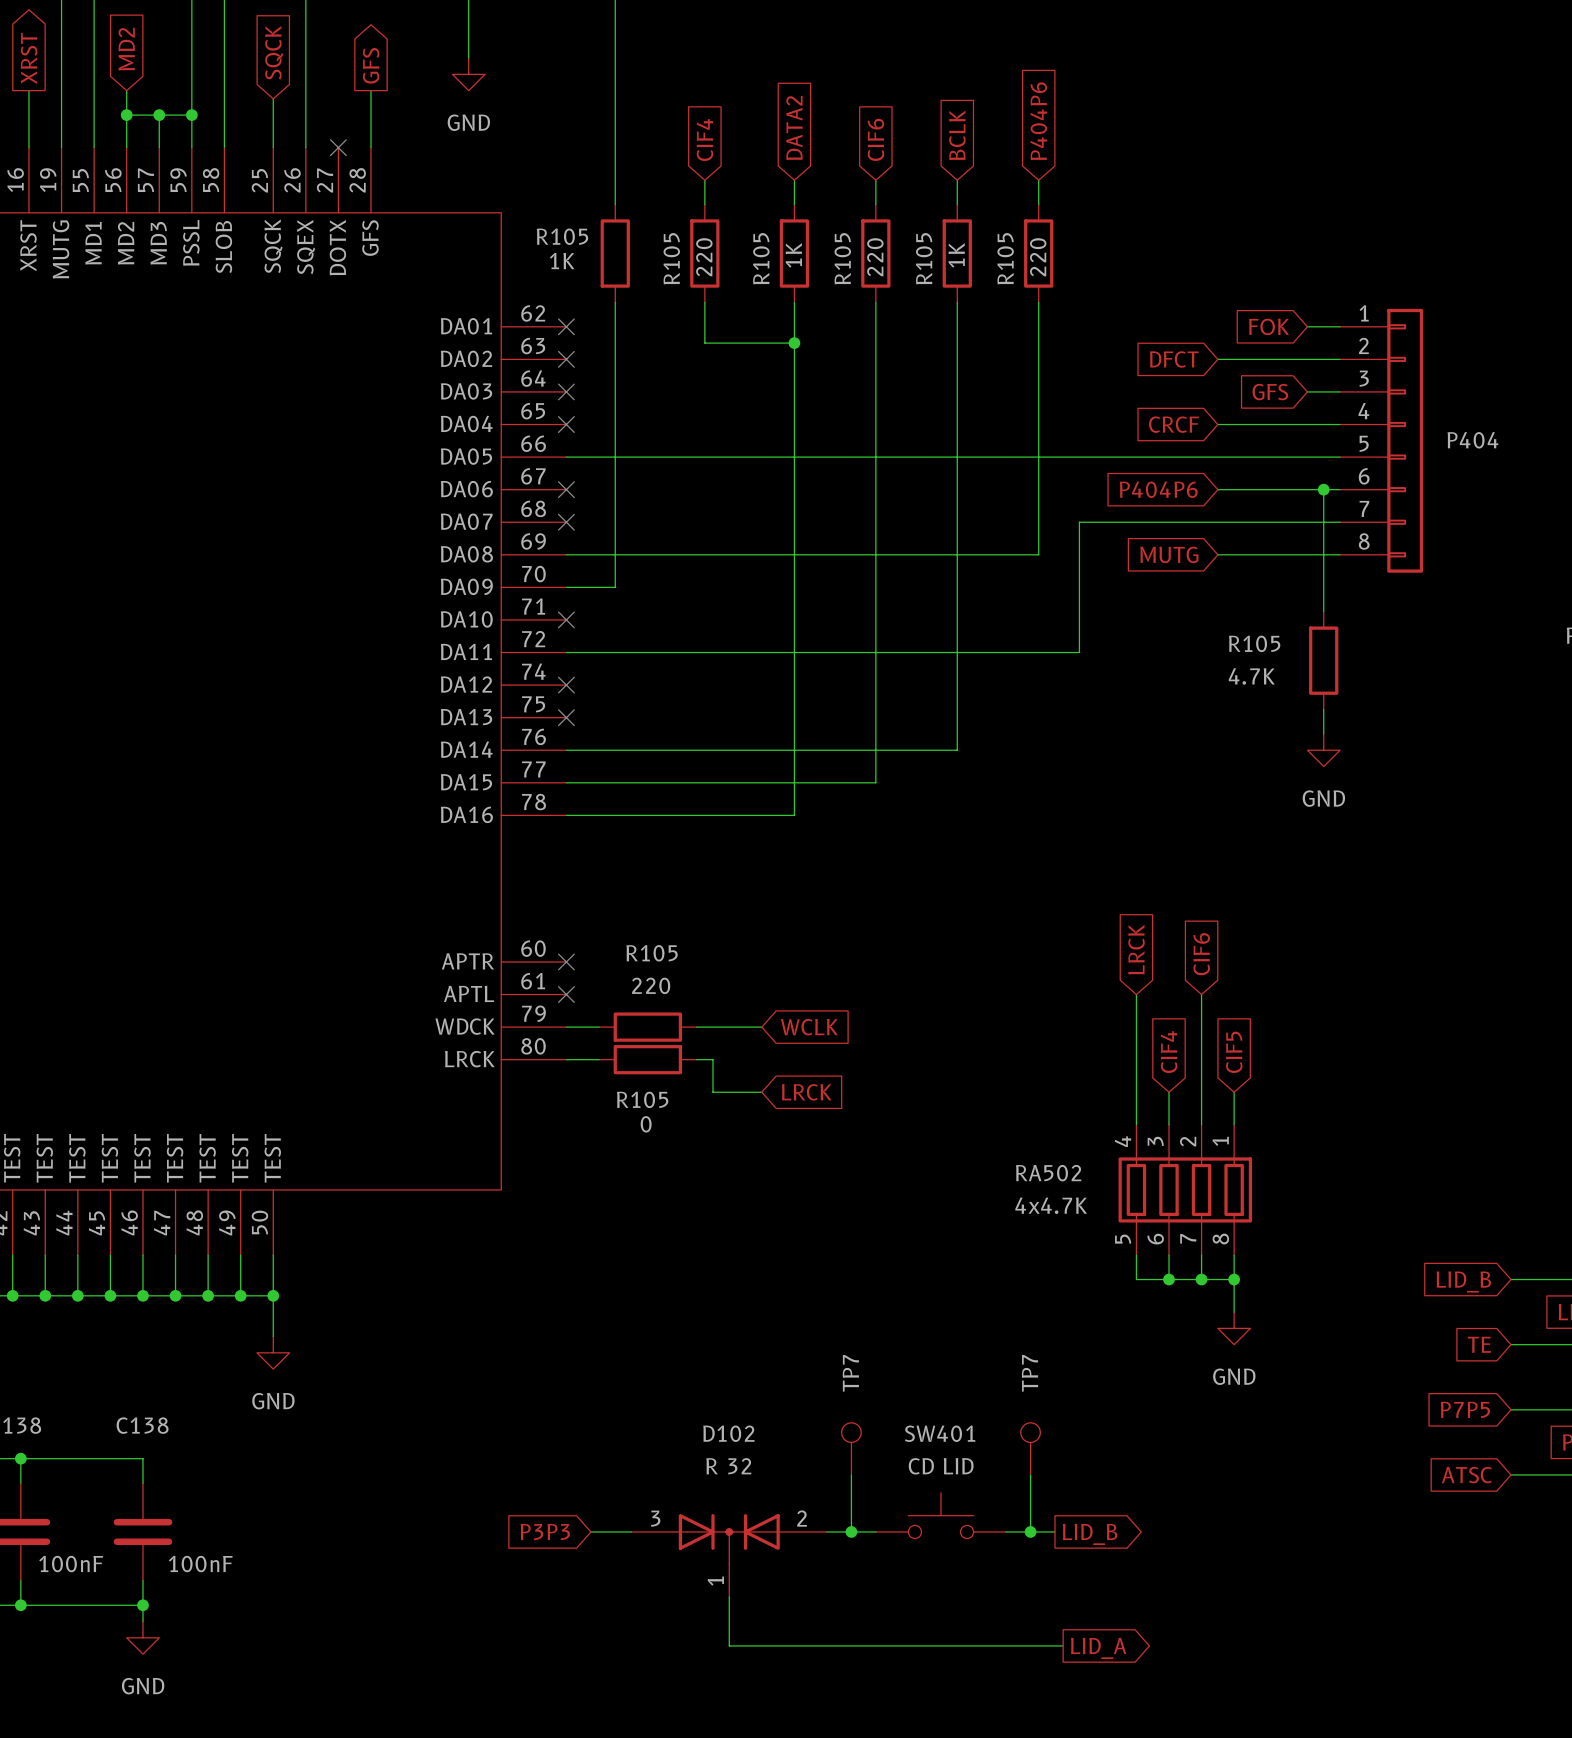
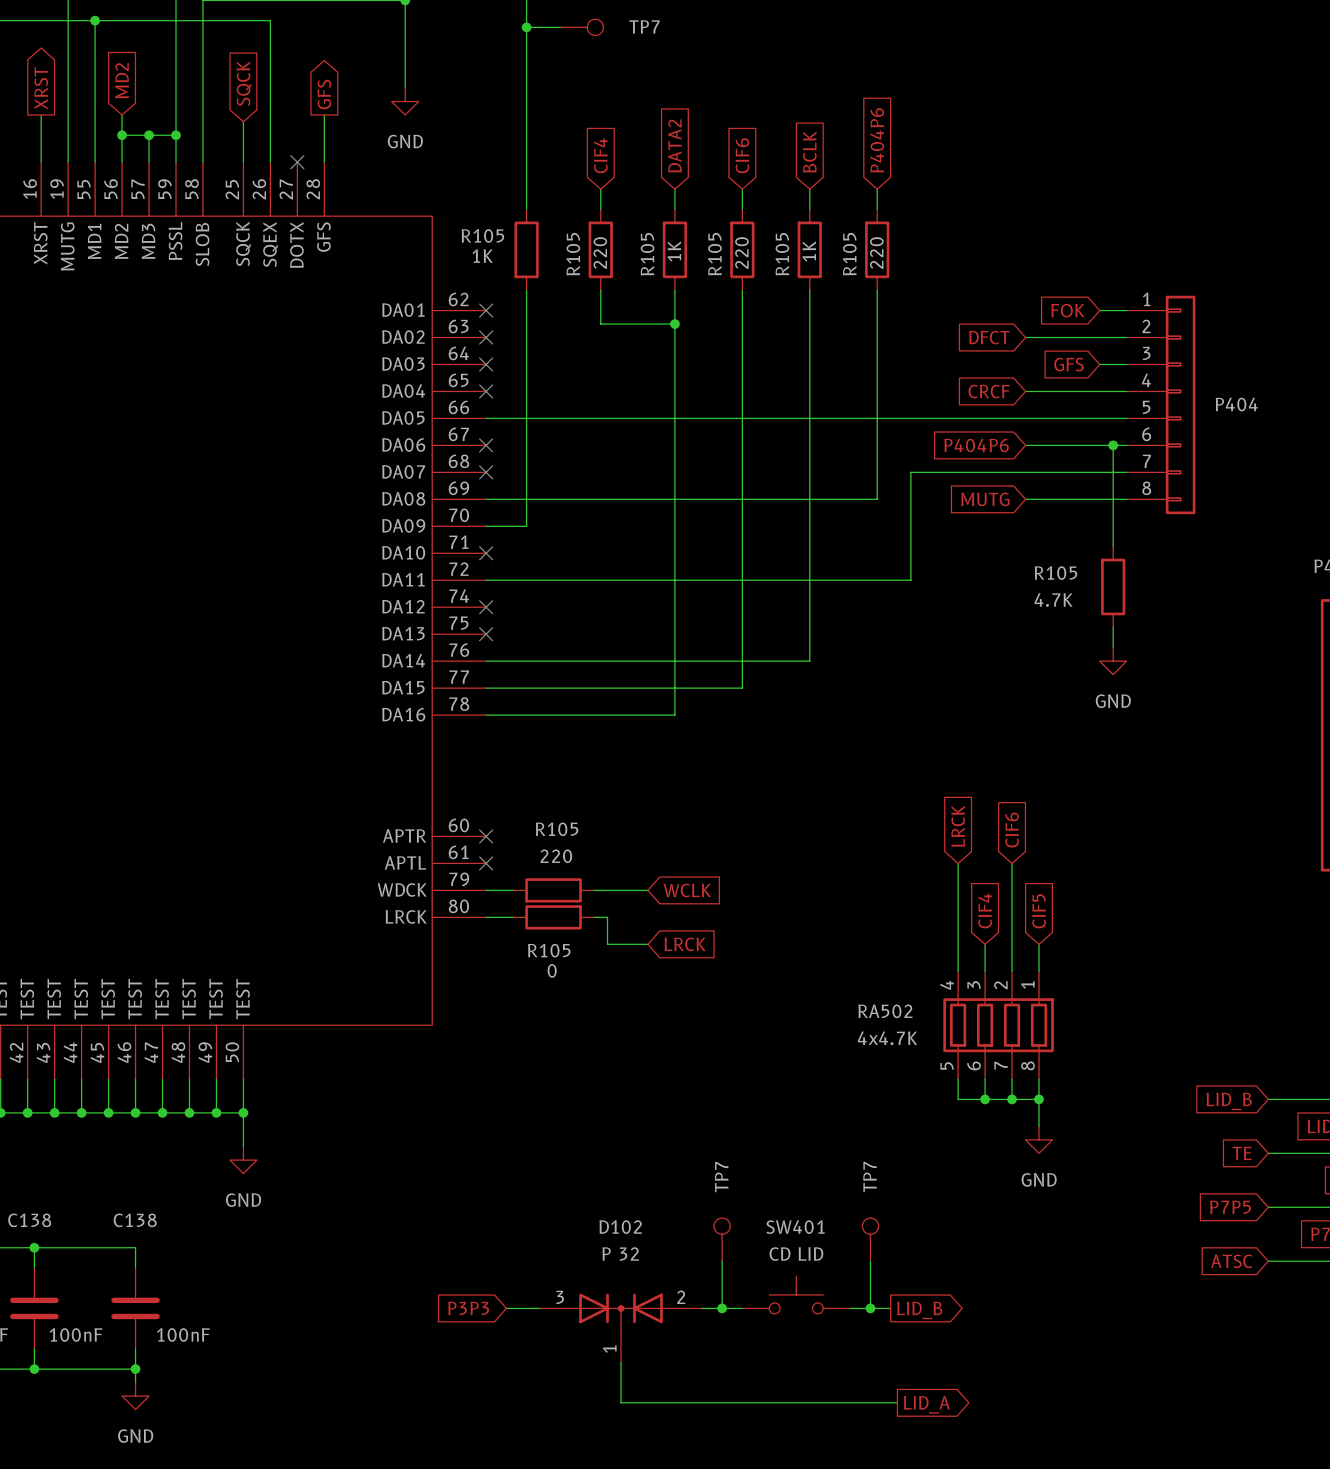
D102 value: R 32 (728, 1466) -> P 32 (620, 1253)

